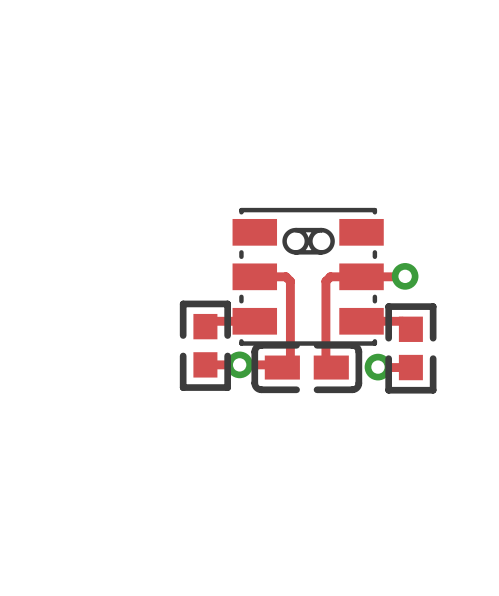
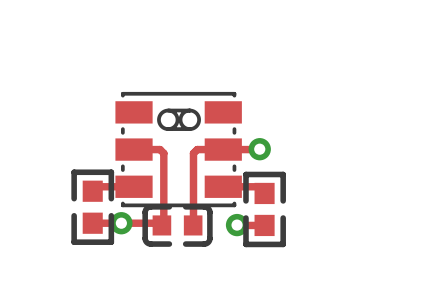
part footprint: [251, 341, 363, 394] -> [142, 204, 213, 247]

